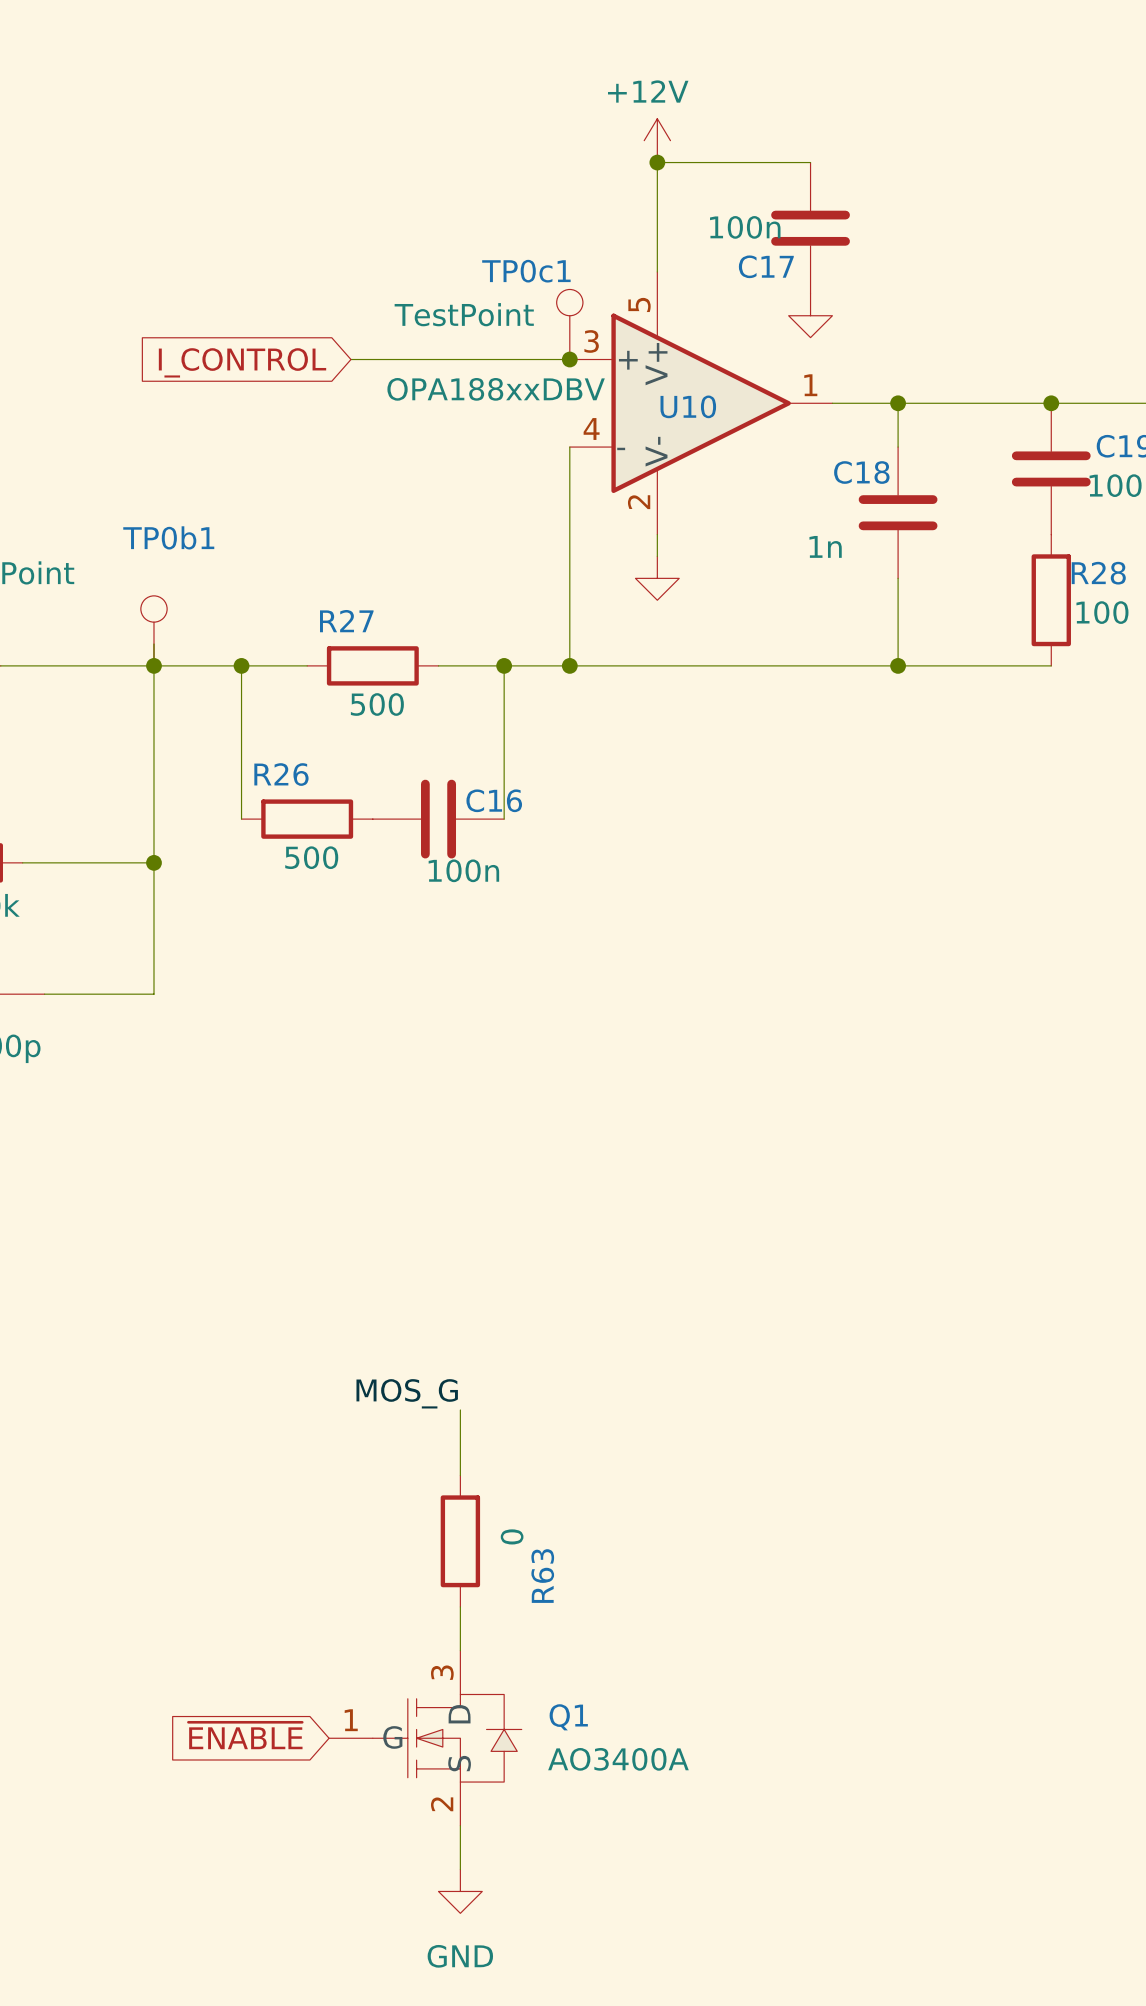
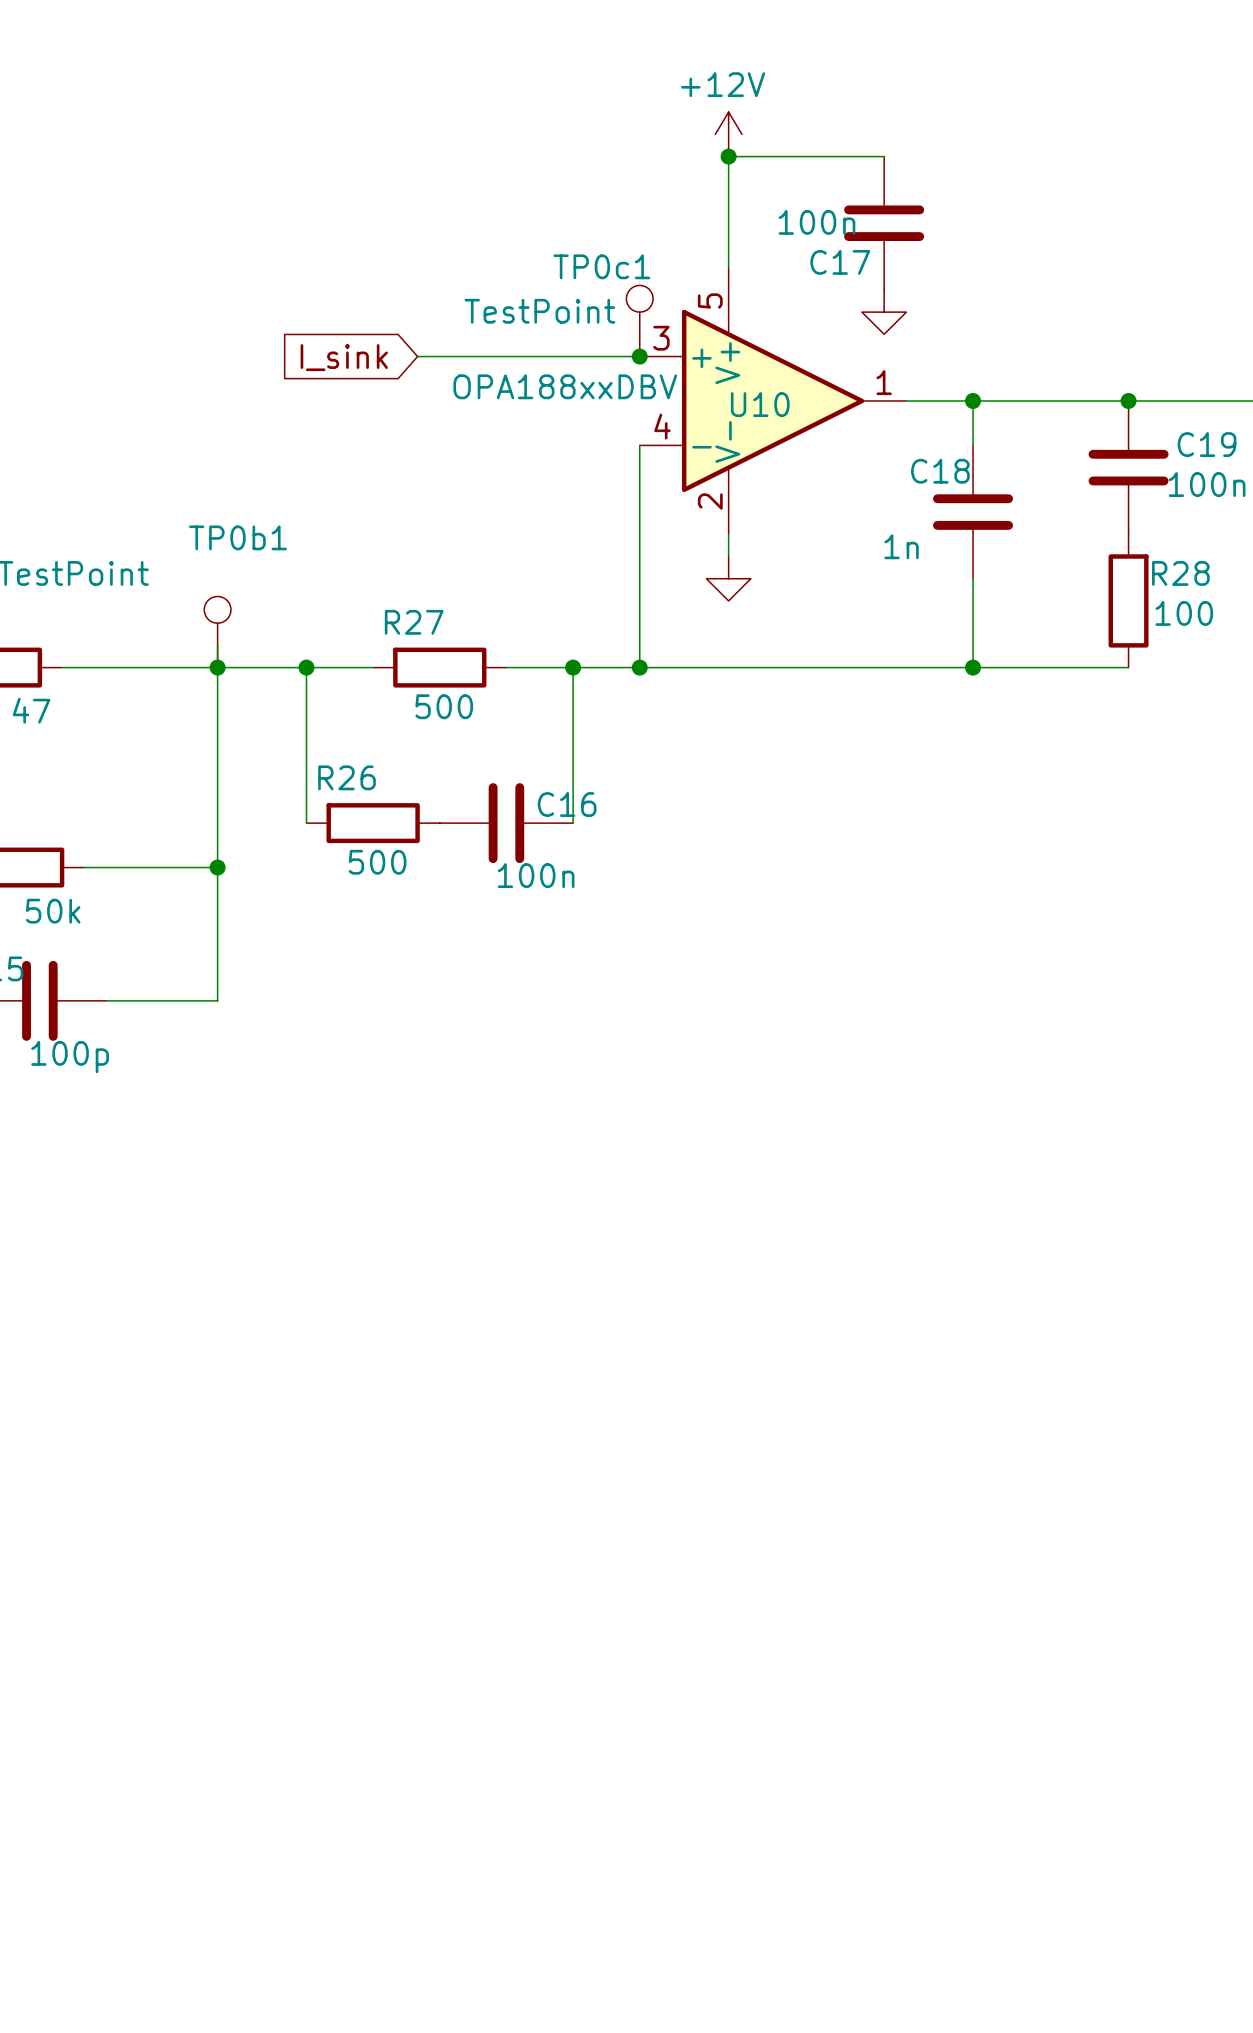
global label: I_CONTROL (242, 362) -> I_sink (344, 357)
label: MOS_G (407, 1393) -> none
wire: (460, 1409) (460, 1475) -> none
R63: 0 (460, 1541) -> none
wire: (460, 1606) (460, 1650) -> none
global label: ~{ENABLE} (245, 1735) -> none
Q1: AO3400A (425, 1738) -> none
wire: (460, 1825) (460, 1869) -> none
power symbol: GND (460, 1891) -> none

